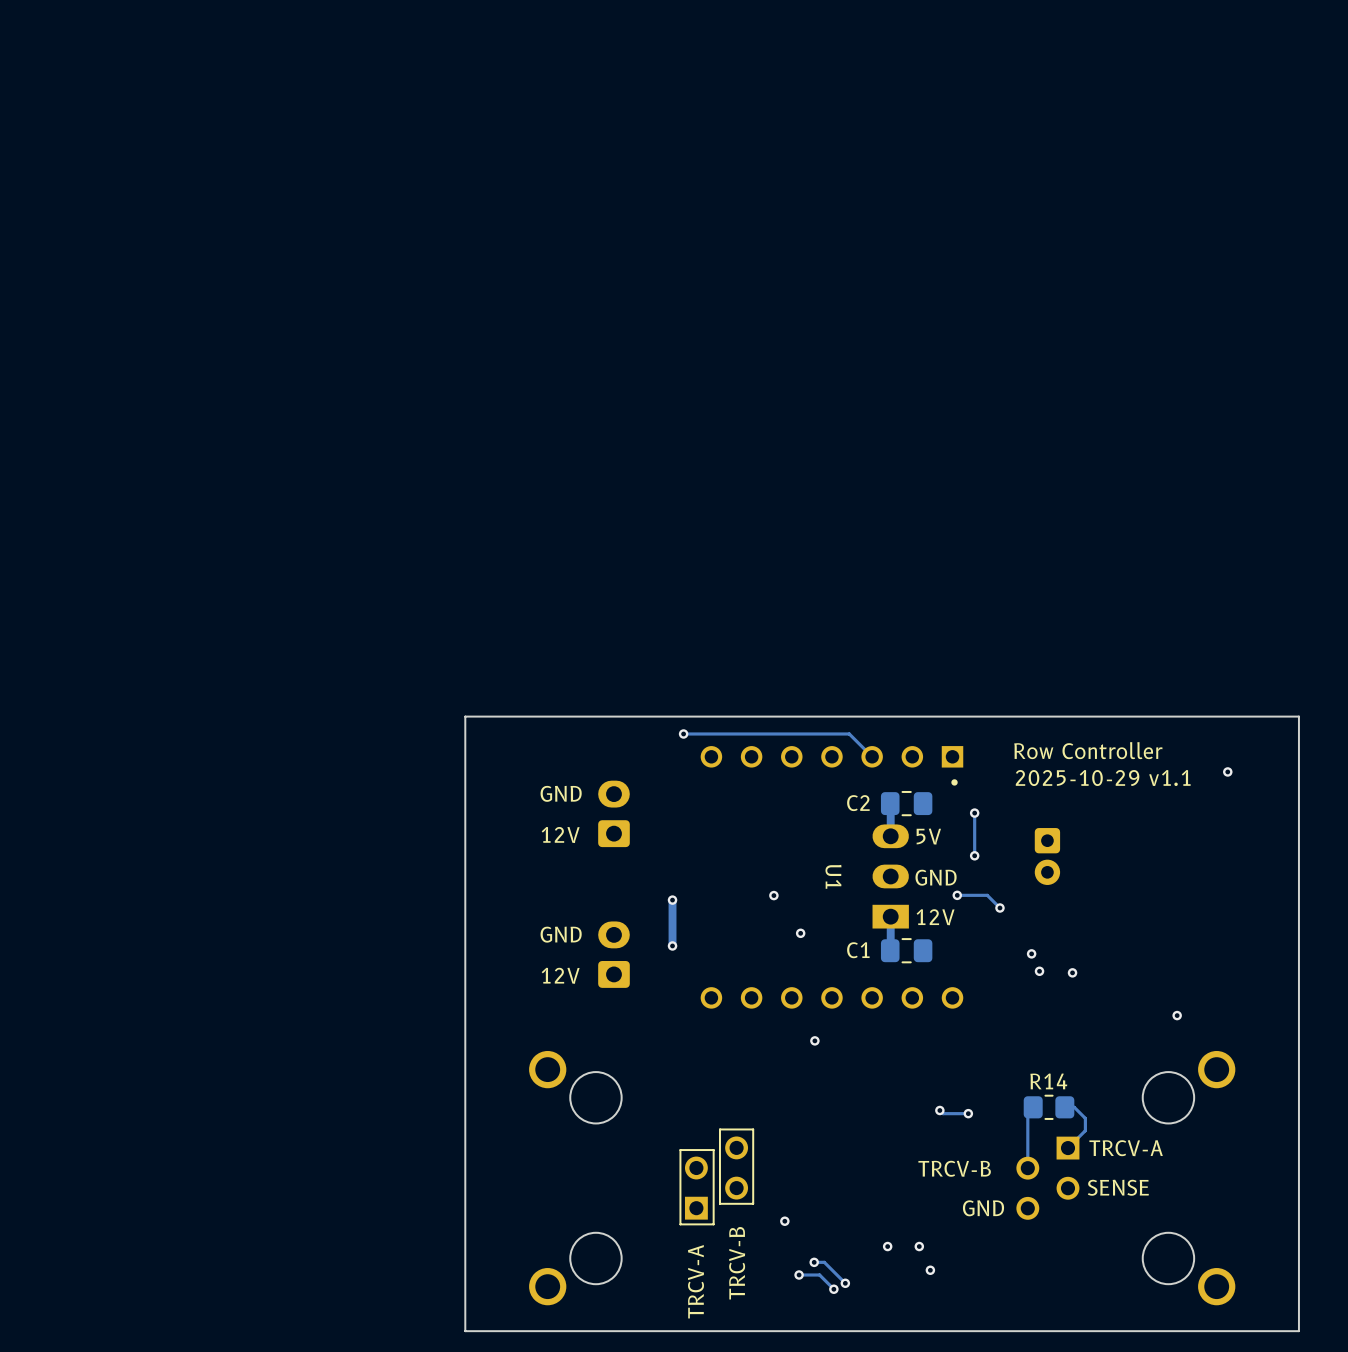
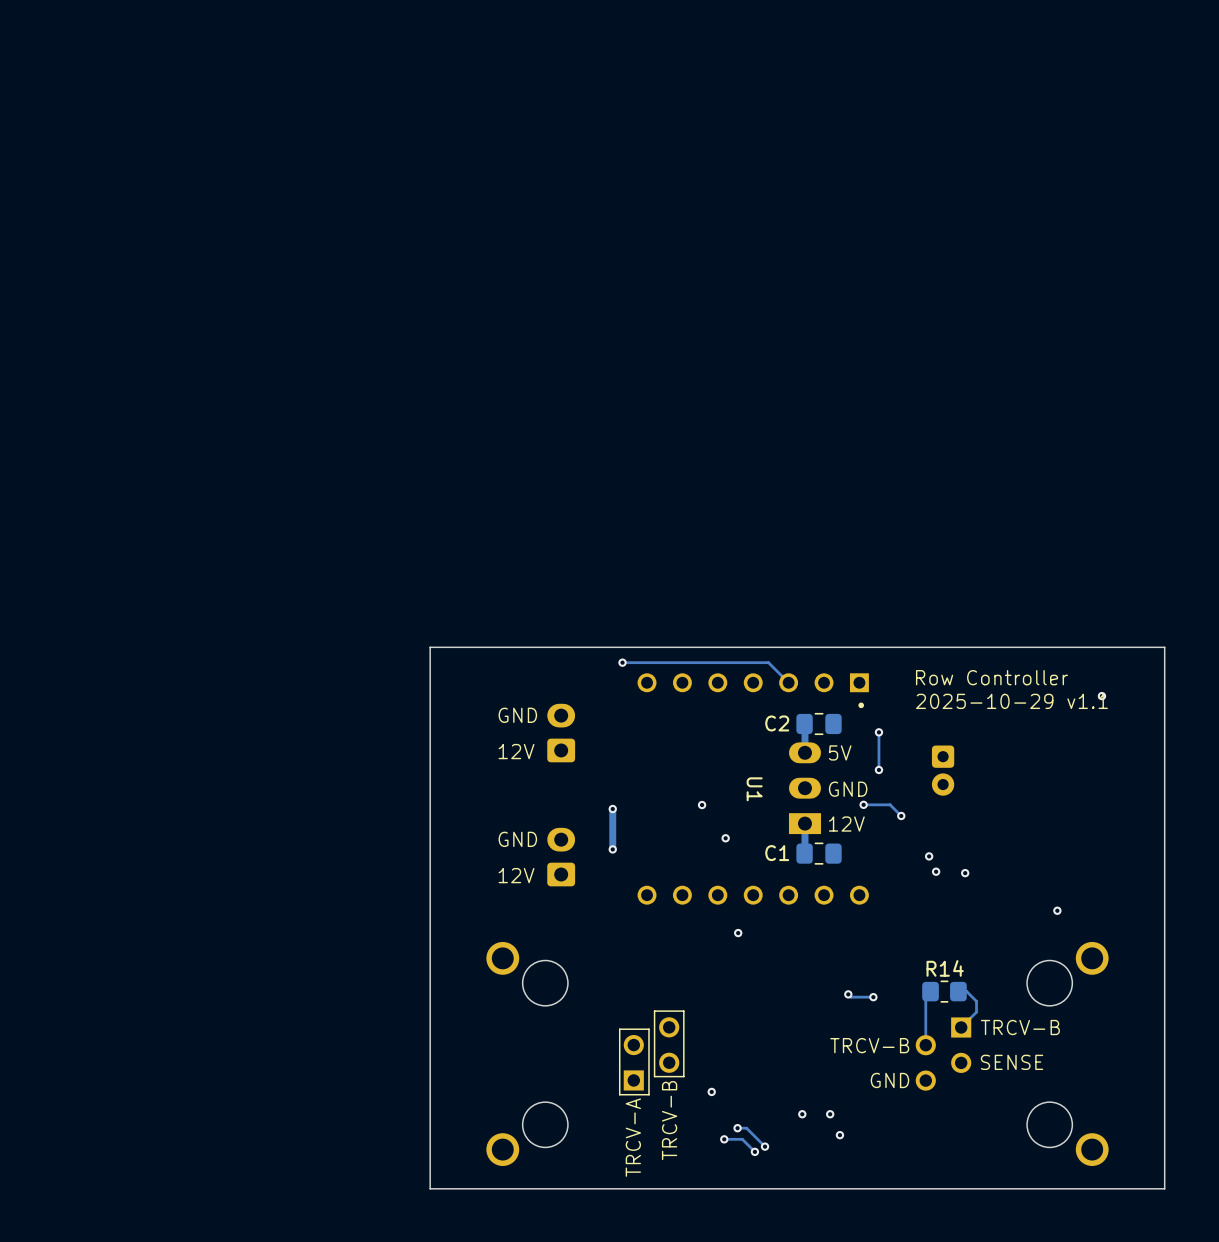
text: TRCV-A (1126, 1148) -> TRCV-B (1020, 1027)

